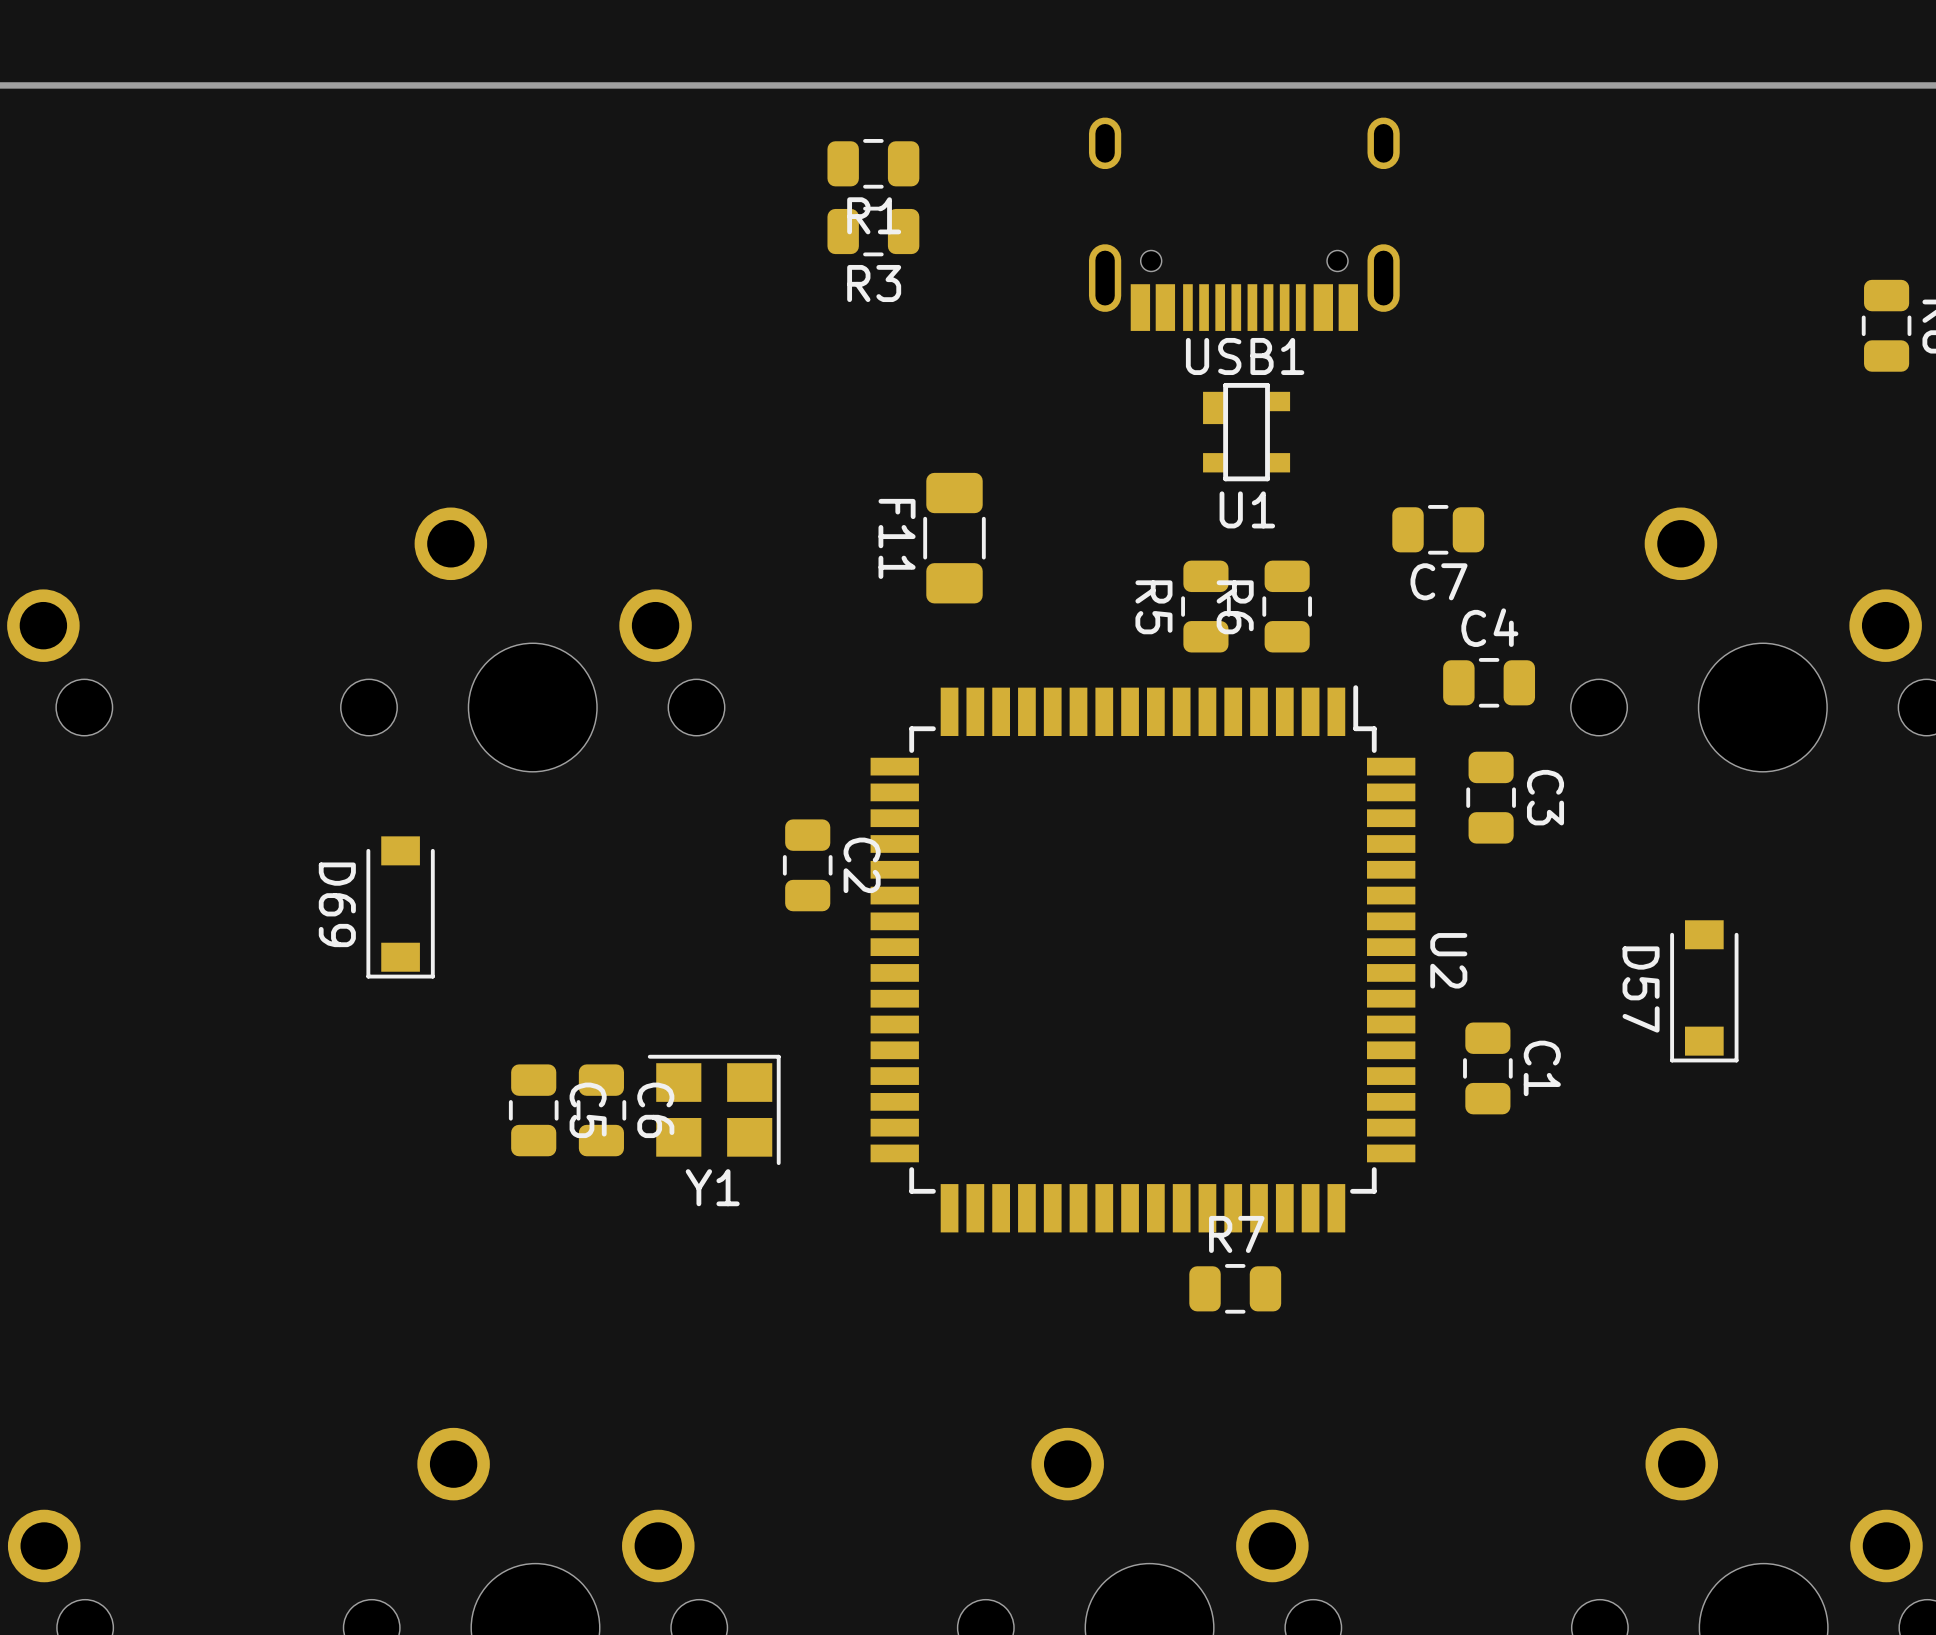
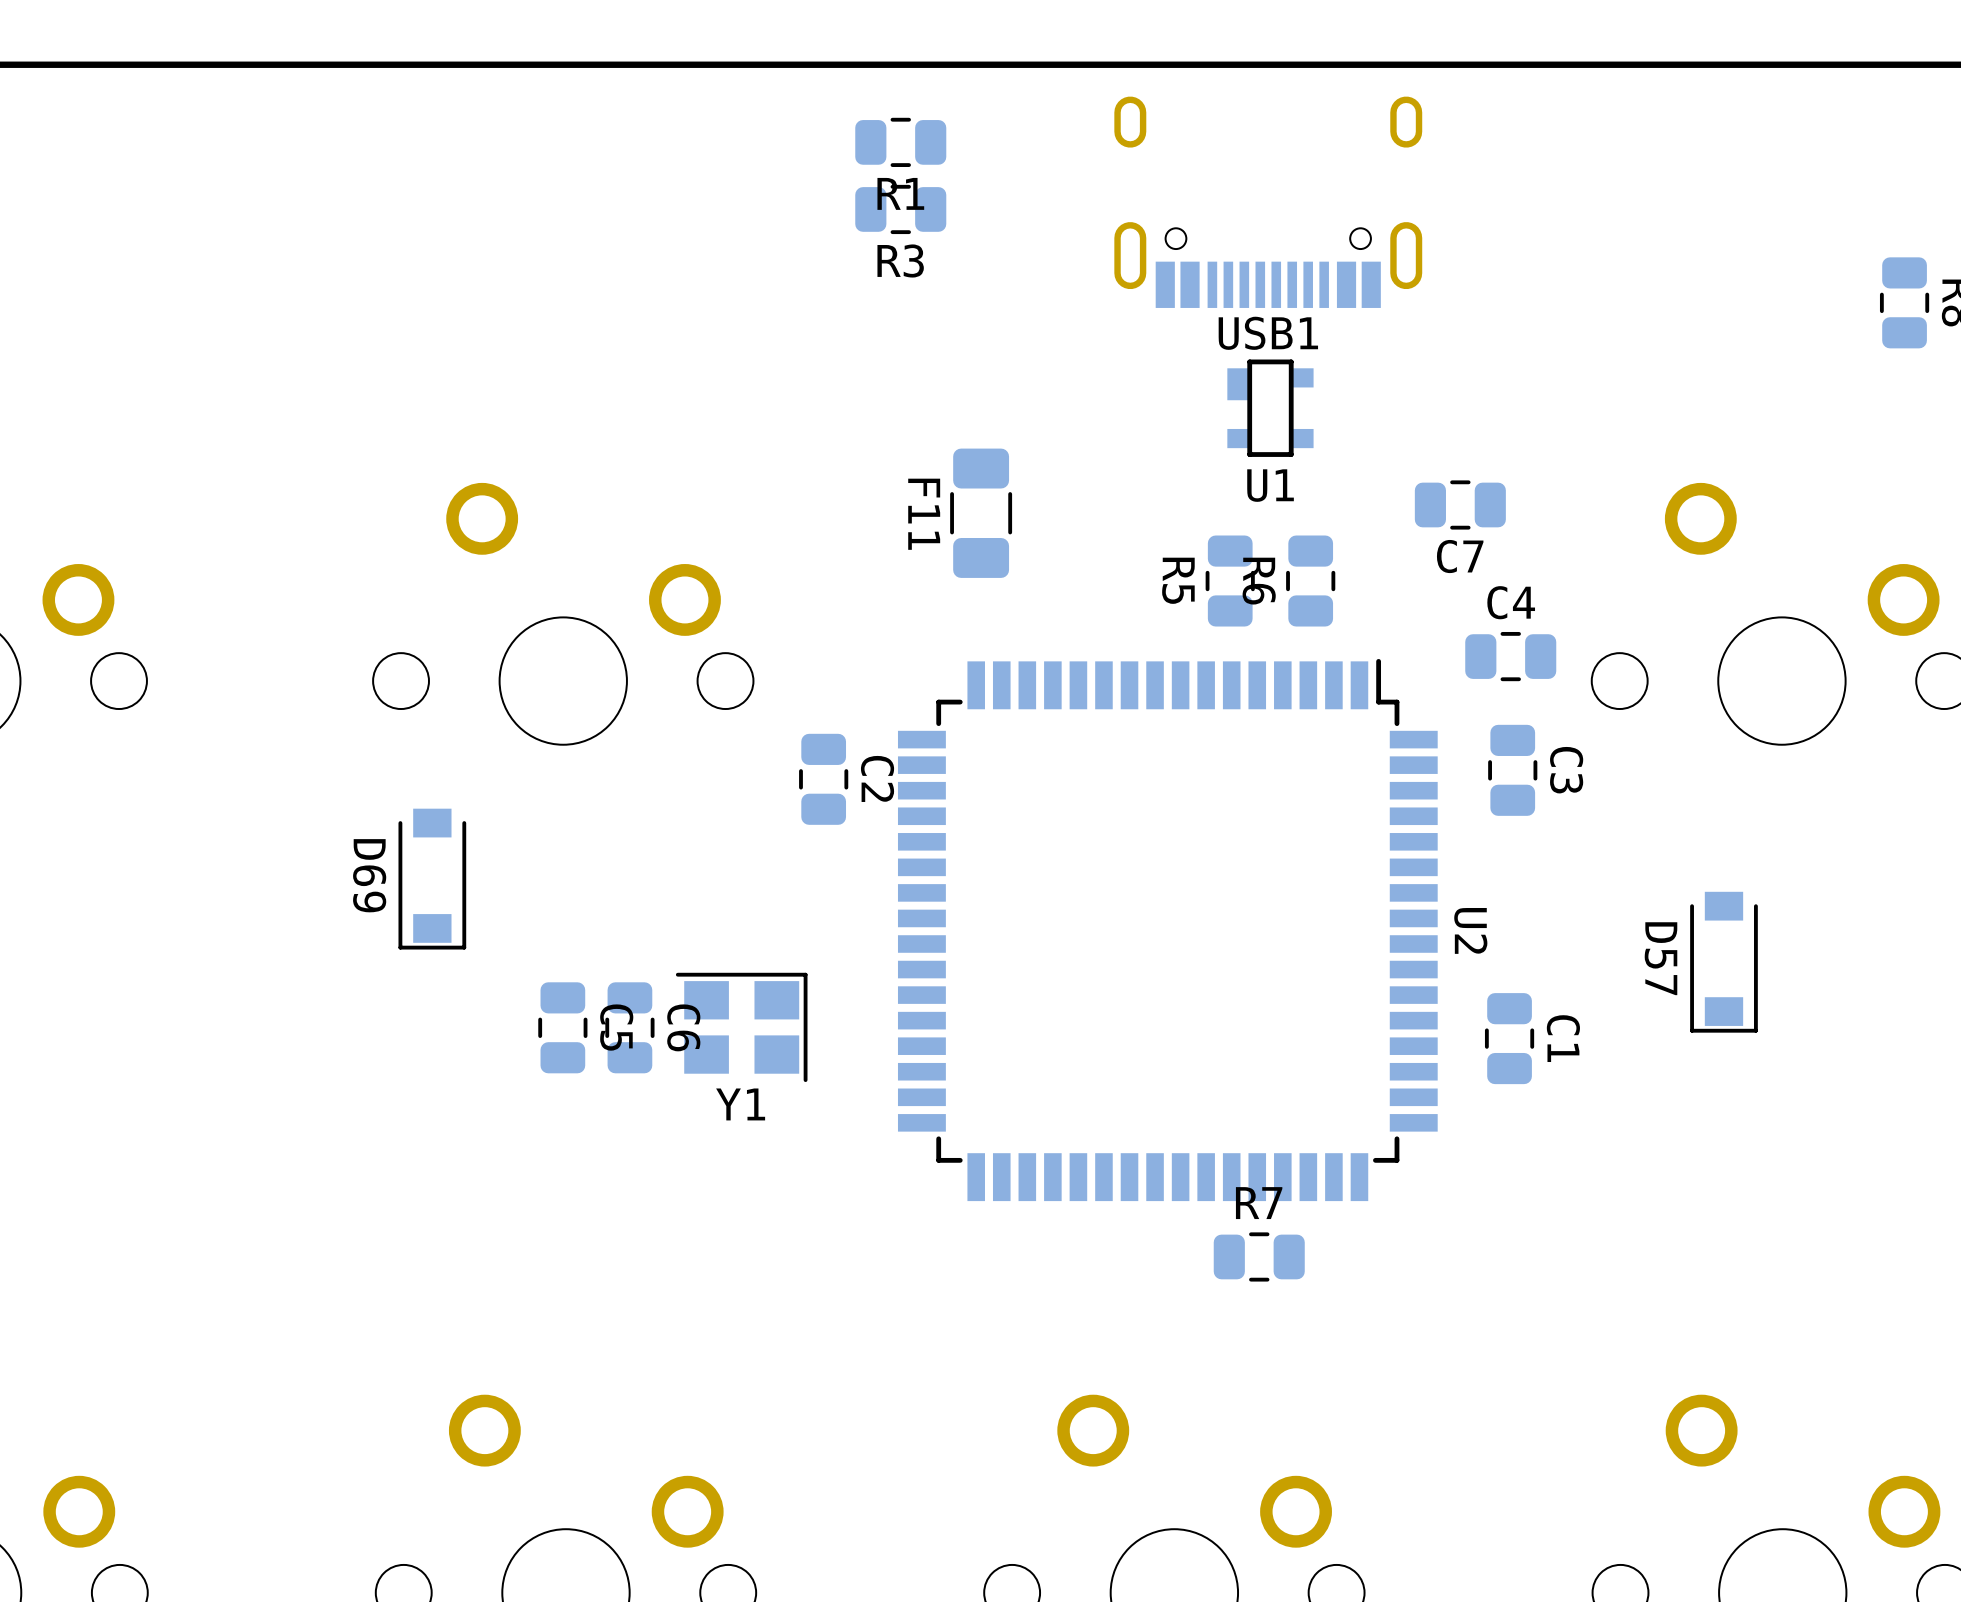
C2 position: (807, 865) -> (823, 779)
Y1 position: (714, 1109) -> (741, 1027)
C5 position: (533, 1110) -> (562, 1027)
C6 position: (601, 1110) -> (629, 1027)

